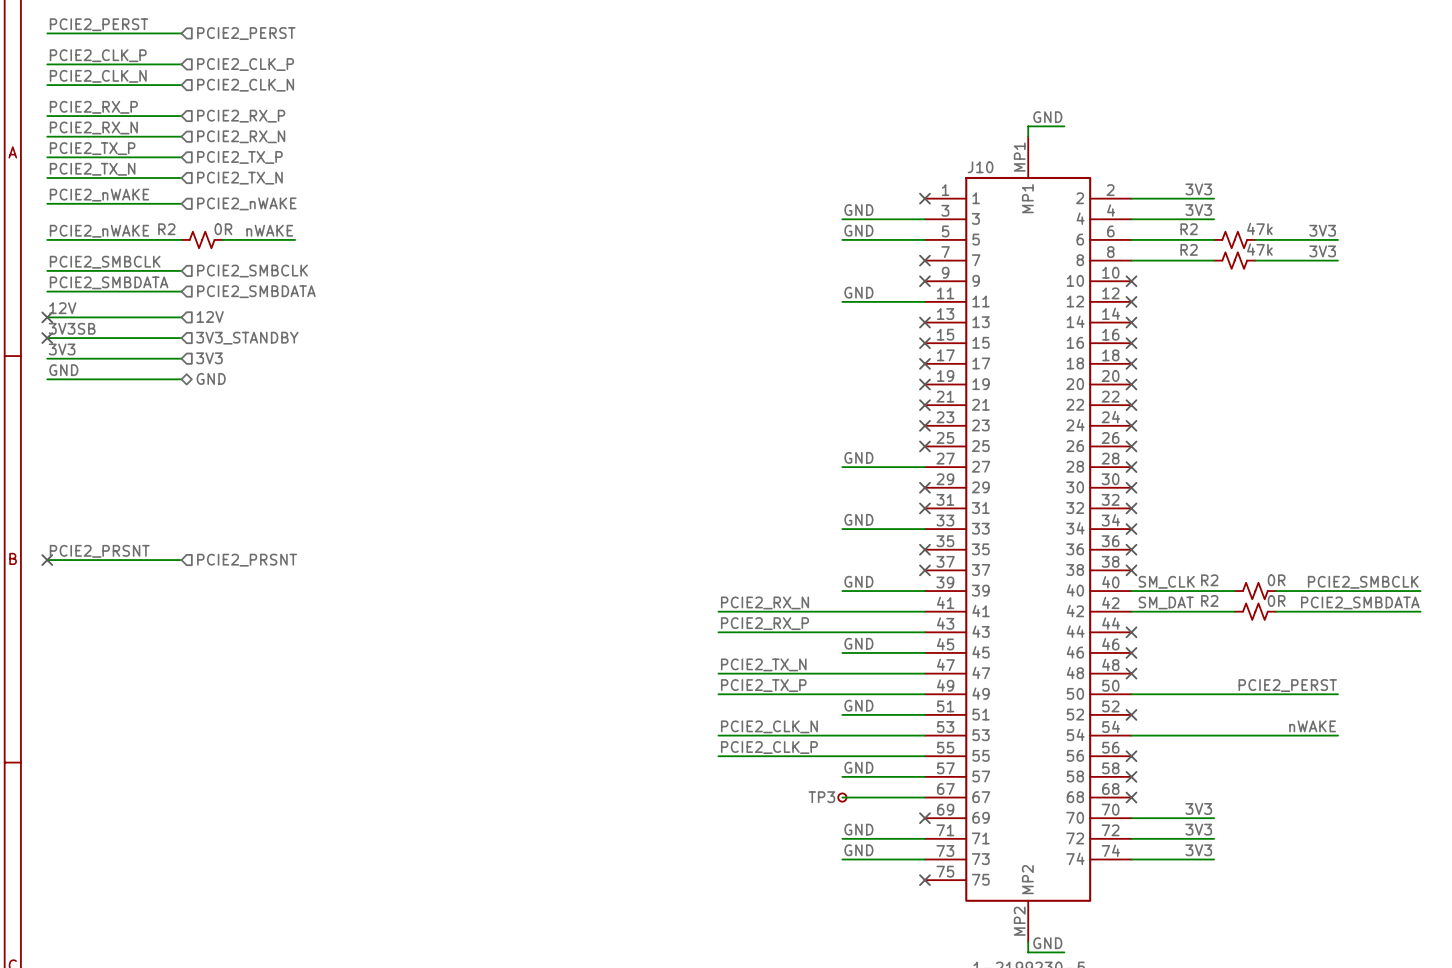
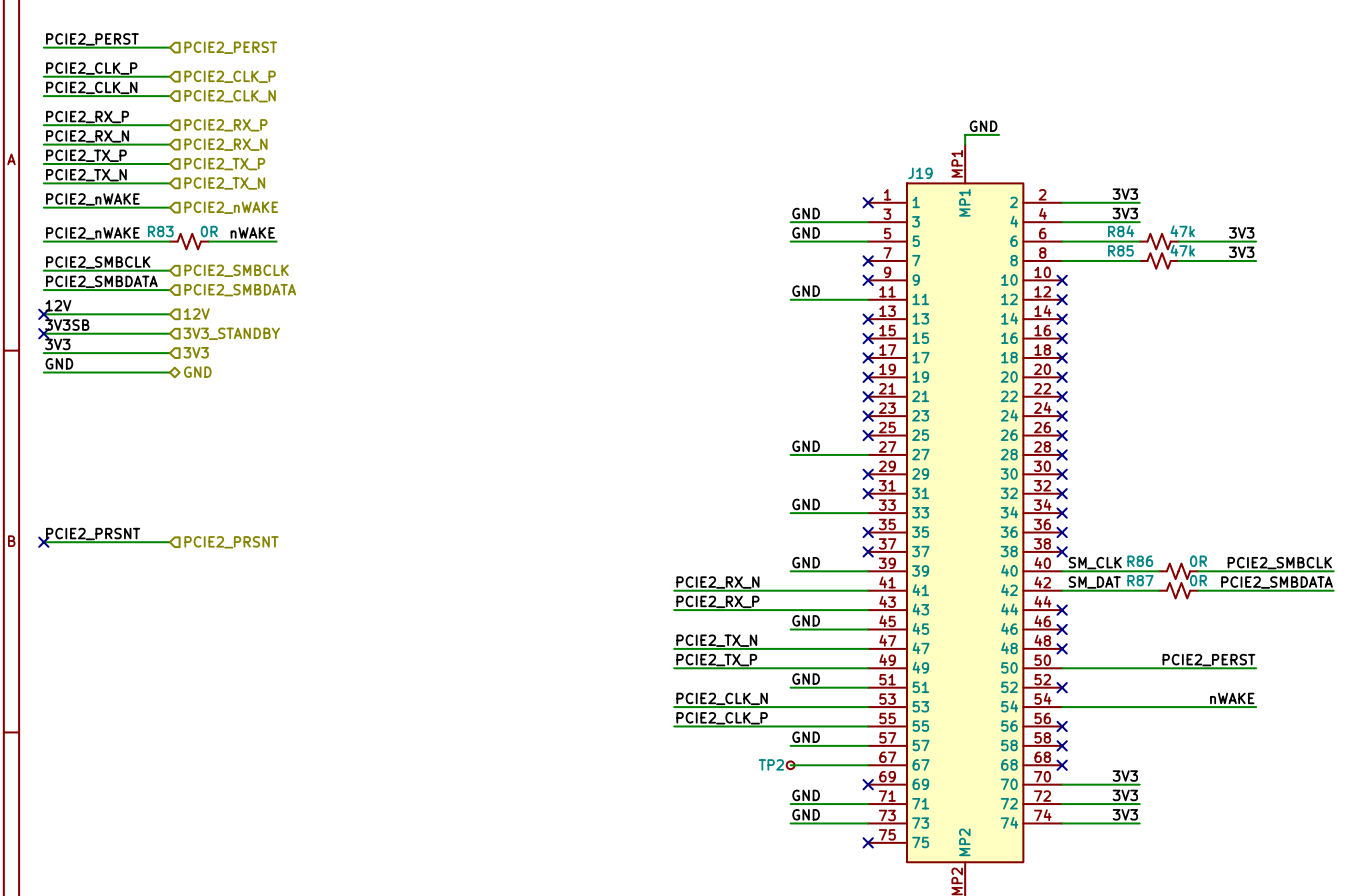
J10 name: J10 (980, 167) -> J19 (920, 173)
R2 name: R2 (166, 229) -> R83 (160, 231)
R2 name: R2 (1189, 229) -> R84 (1121, 231)
R2 name: R2 (1189, 249) -> R85 (1120, 250)
R2 name: R2 (1209, 580) -> R86 (1140, 561)
R2 name: R2 (1209, 600) -> R87 (1140, 580)
TP3 name: TP3 (821, 797) -> TP2 (771, 764)

